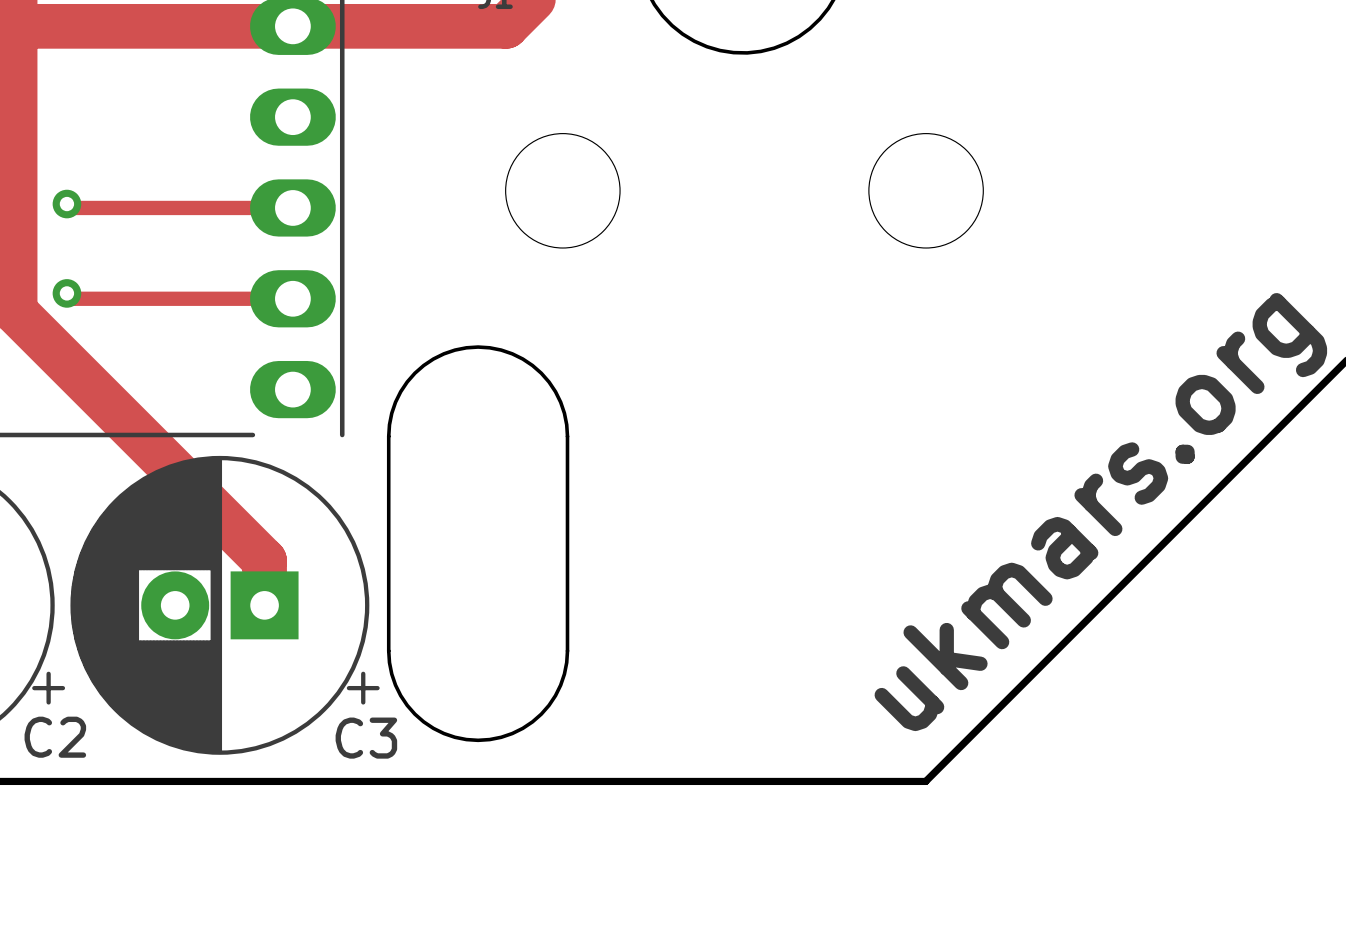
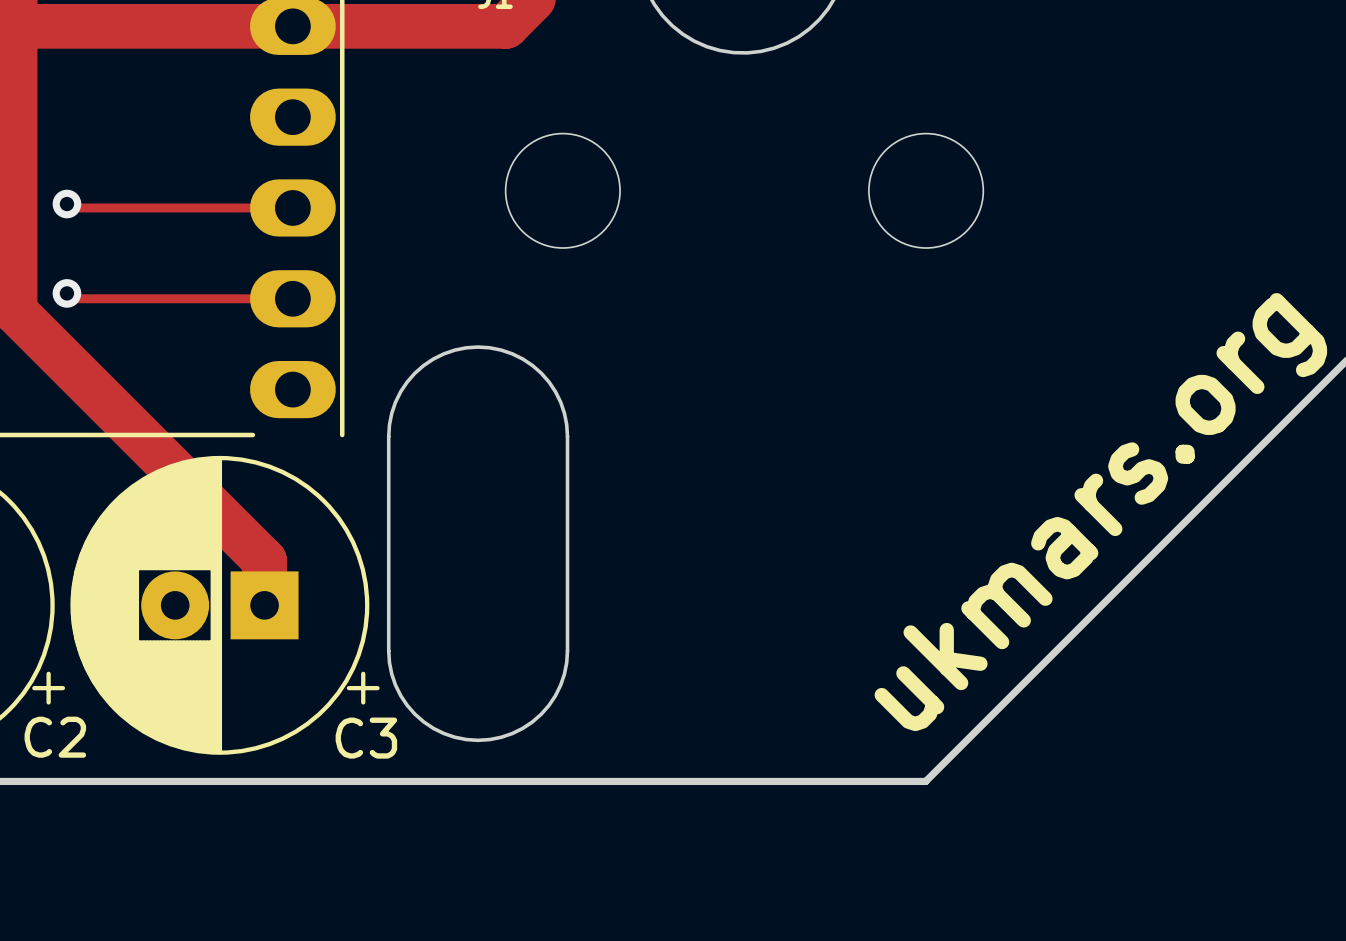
track width: thick (66, 204) (70, 207) (292, 207) -> thin (66, 204) (70, 207) (292, 207)
track width: thick (66, 293) (72, 298) (292, 298) -> thin (66, 293) (72, 298) (292, 298)

